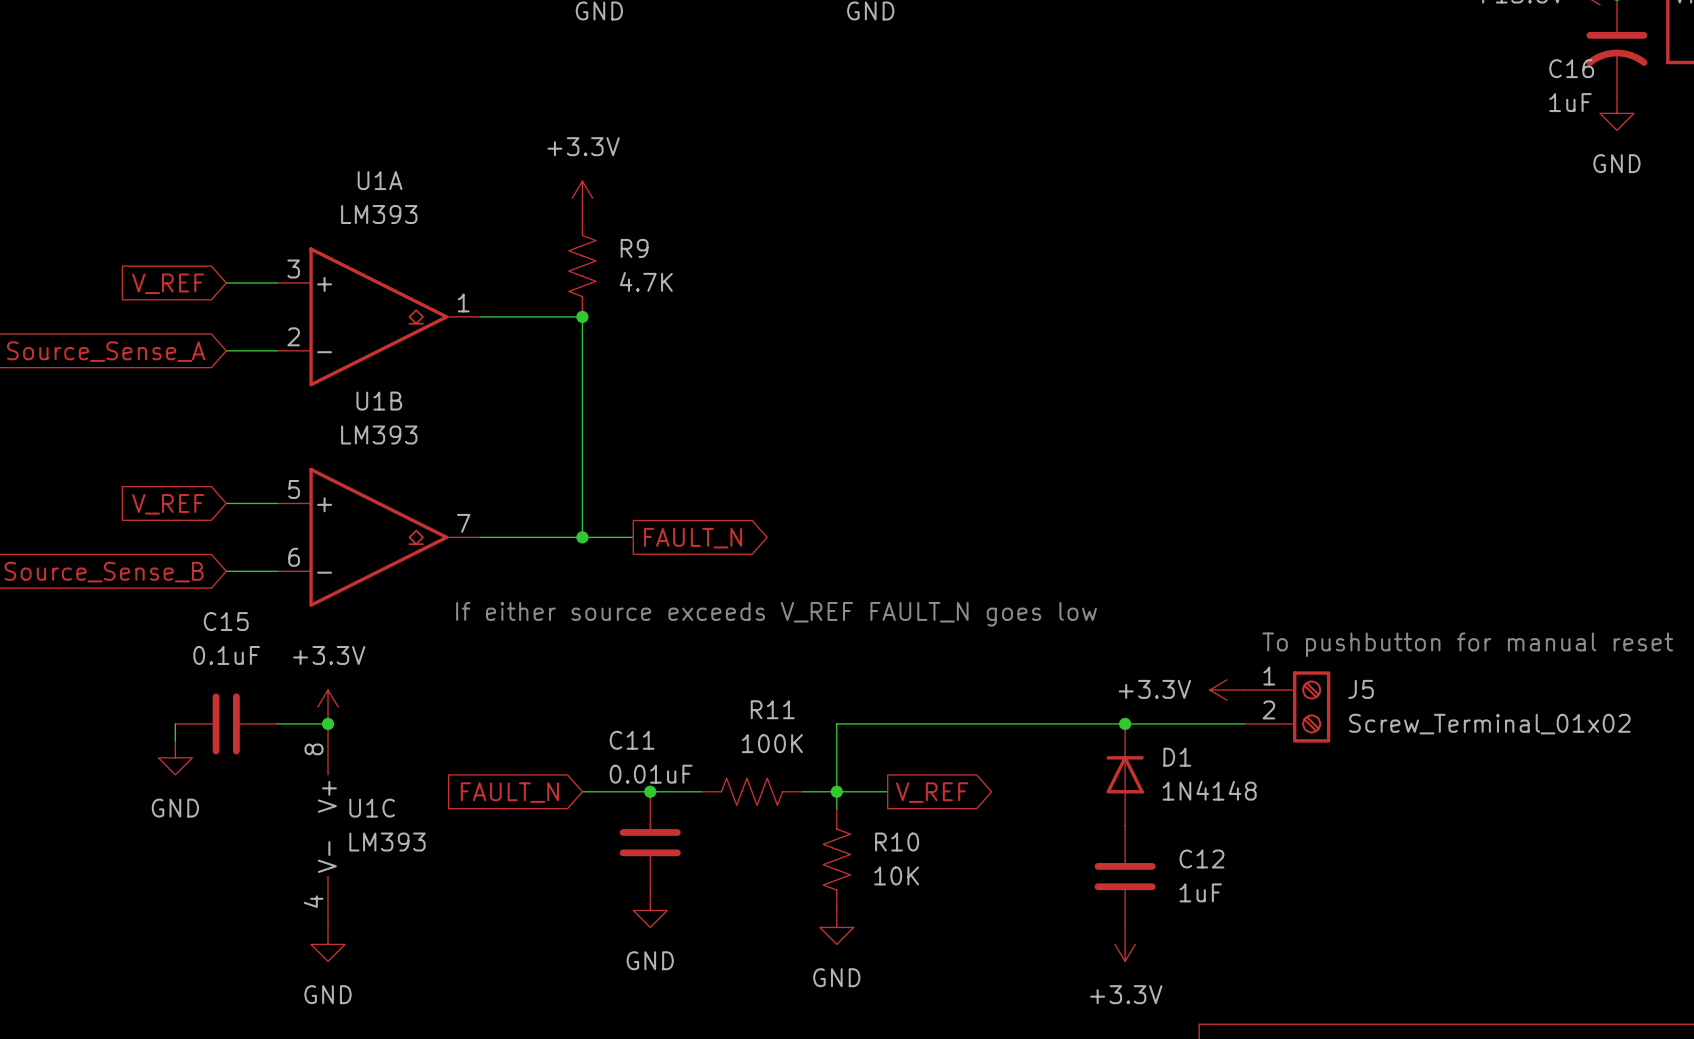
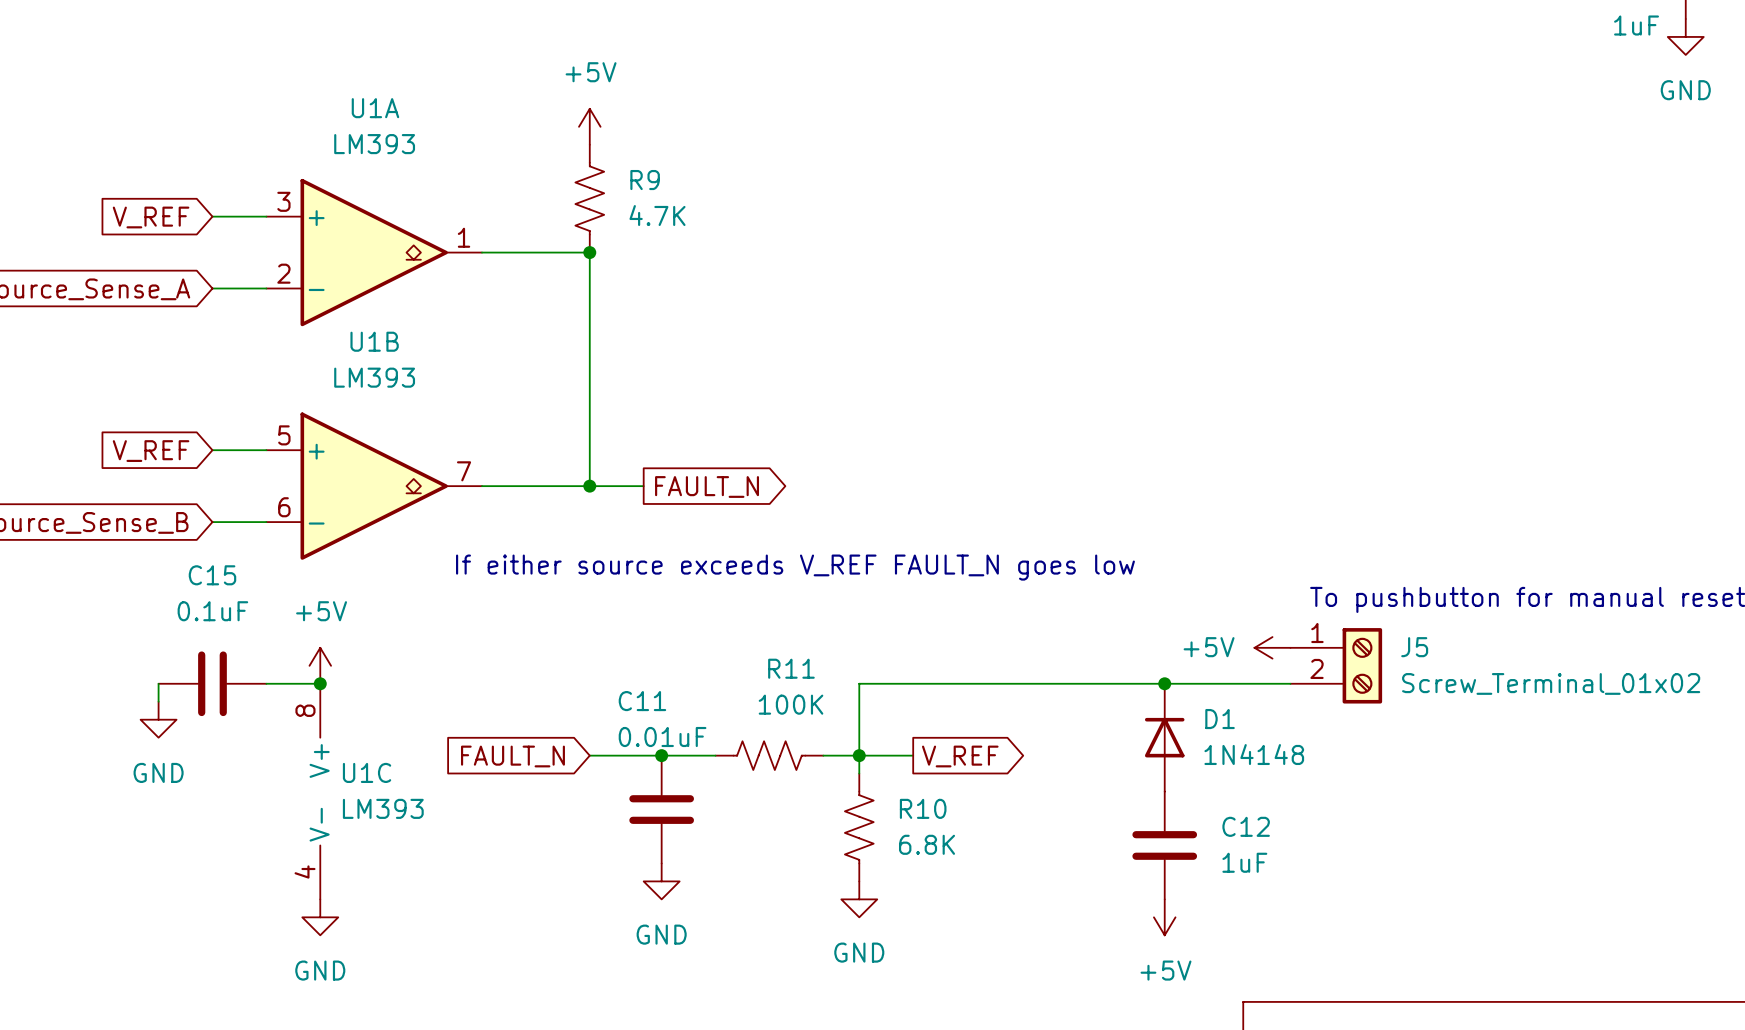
power symbol: +3.3V (582, 198) -> +5V (589, 126)
power symbol: +3.3V (1226, 690) -> +5V (1272, 647)
power symbol: +3.3V (328, 706) -> +5V (320, 665)
R10 value: 10K (896, 875) -> 6.8K (927, 844)
power symbol: +3.3V (1125, 944) -> +5V (1164, 917)

